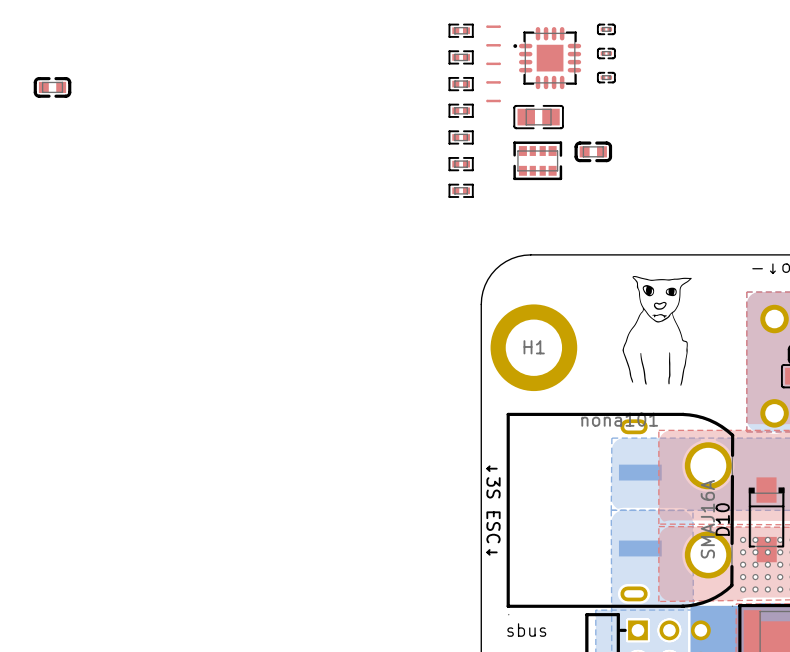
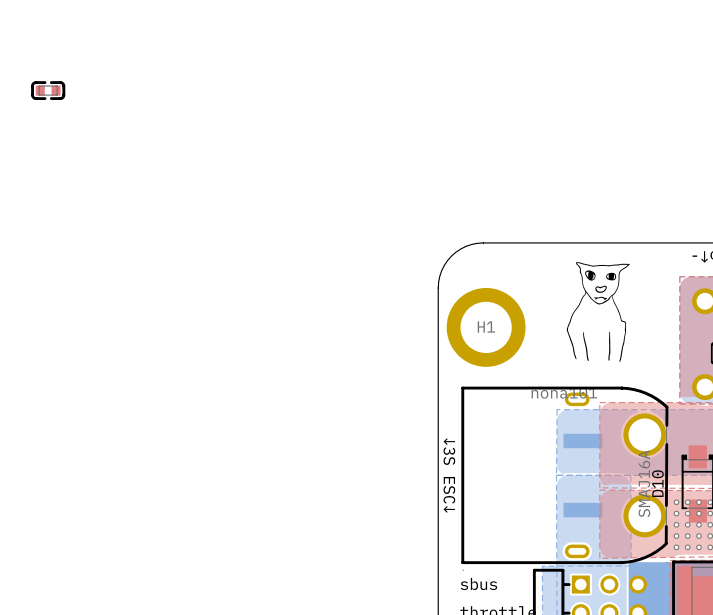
part: (493, 26) -> none
part: (606, 29) -> none
part: (461, 30) -> none
part: (493, 45) -> none
part: (606, 53) -> none
part: (461, 57) -> none
part: (547, 58) -> none
part: (493, 63) -> none
part: (606, 77) -> none
part: (493, 82) -> none
part: (461, 84) -> none
part: (493, 100) -> none
part: (461, 110) -> none
part: (538, 117) -> none
part: (461, 137) -> none
part: (593, 151) -> none
part: (537, 160) -> none
part: (461, 164) -> none
part: (461, 190) -> none

